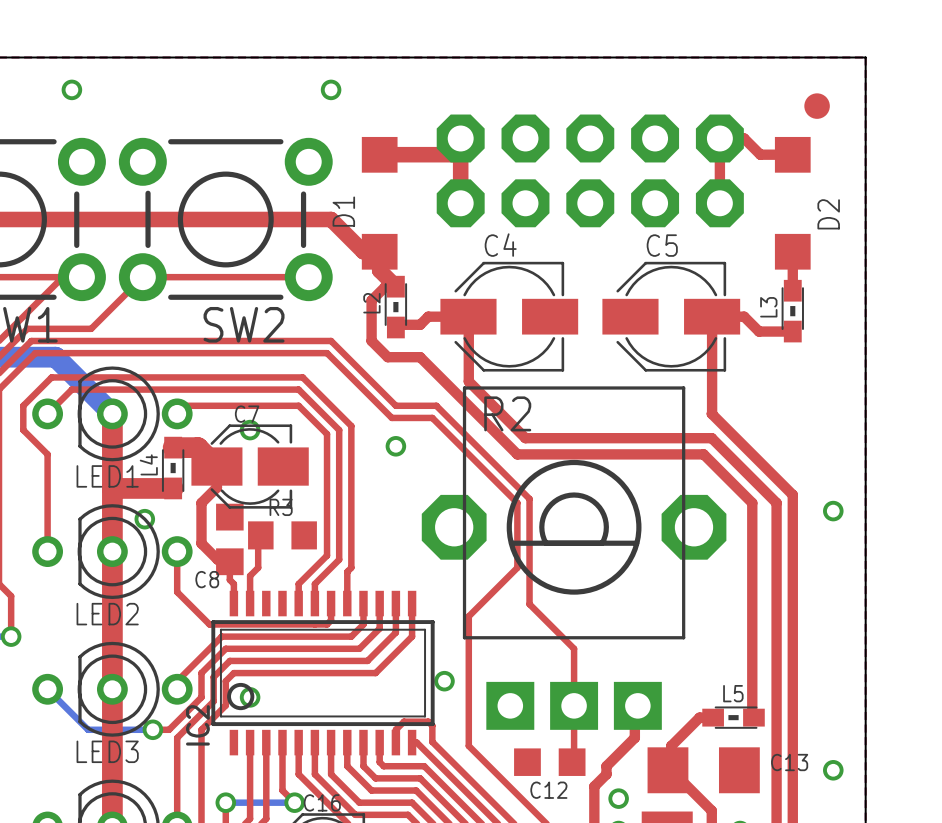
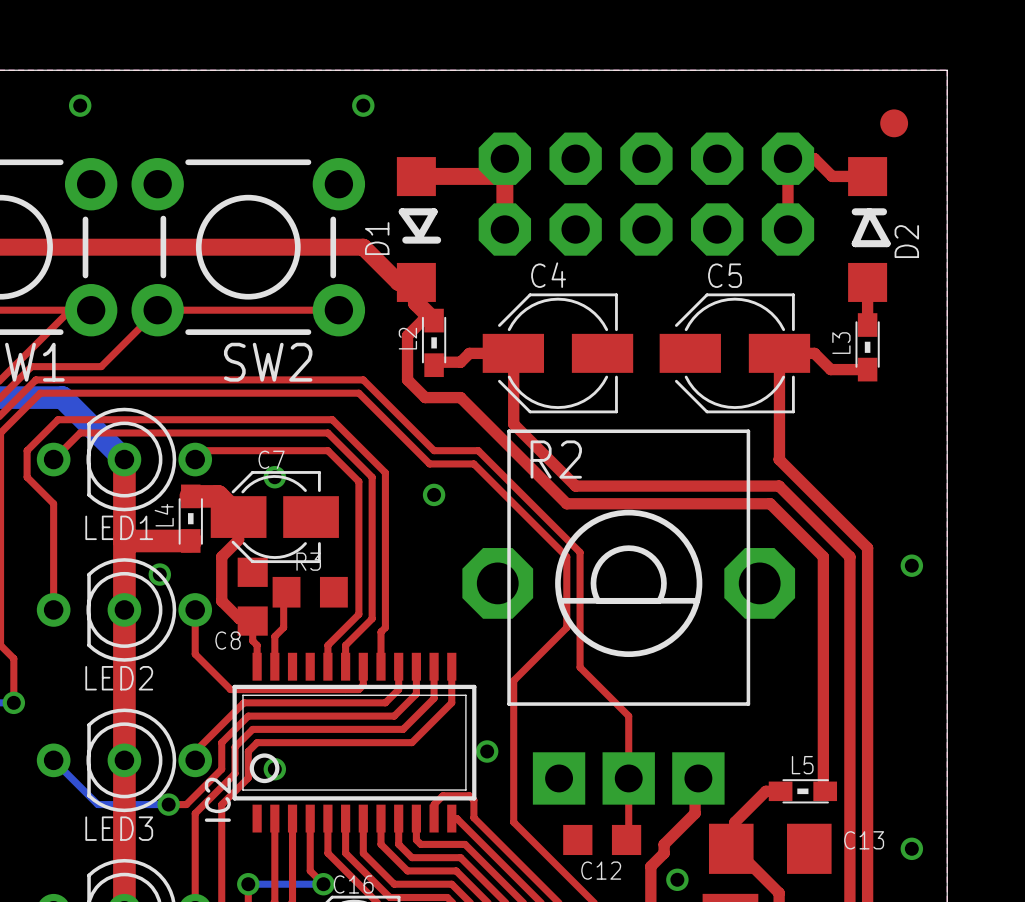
line: none -> (402, 211) (434, 211) (419, 236) (402, 211)
line: none -> (855, 211) (883, 211)
line: none -> (869, 211) (855, 243) (887, 243) (869, 211)
line: none -> (405, 240) (437, 240)

